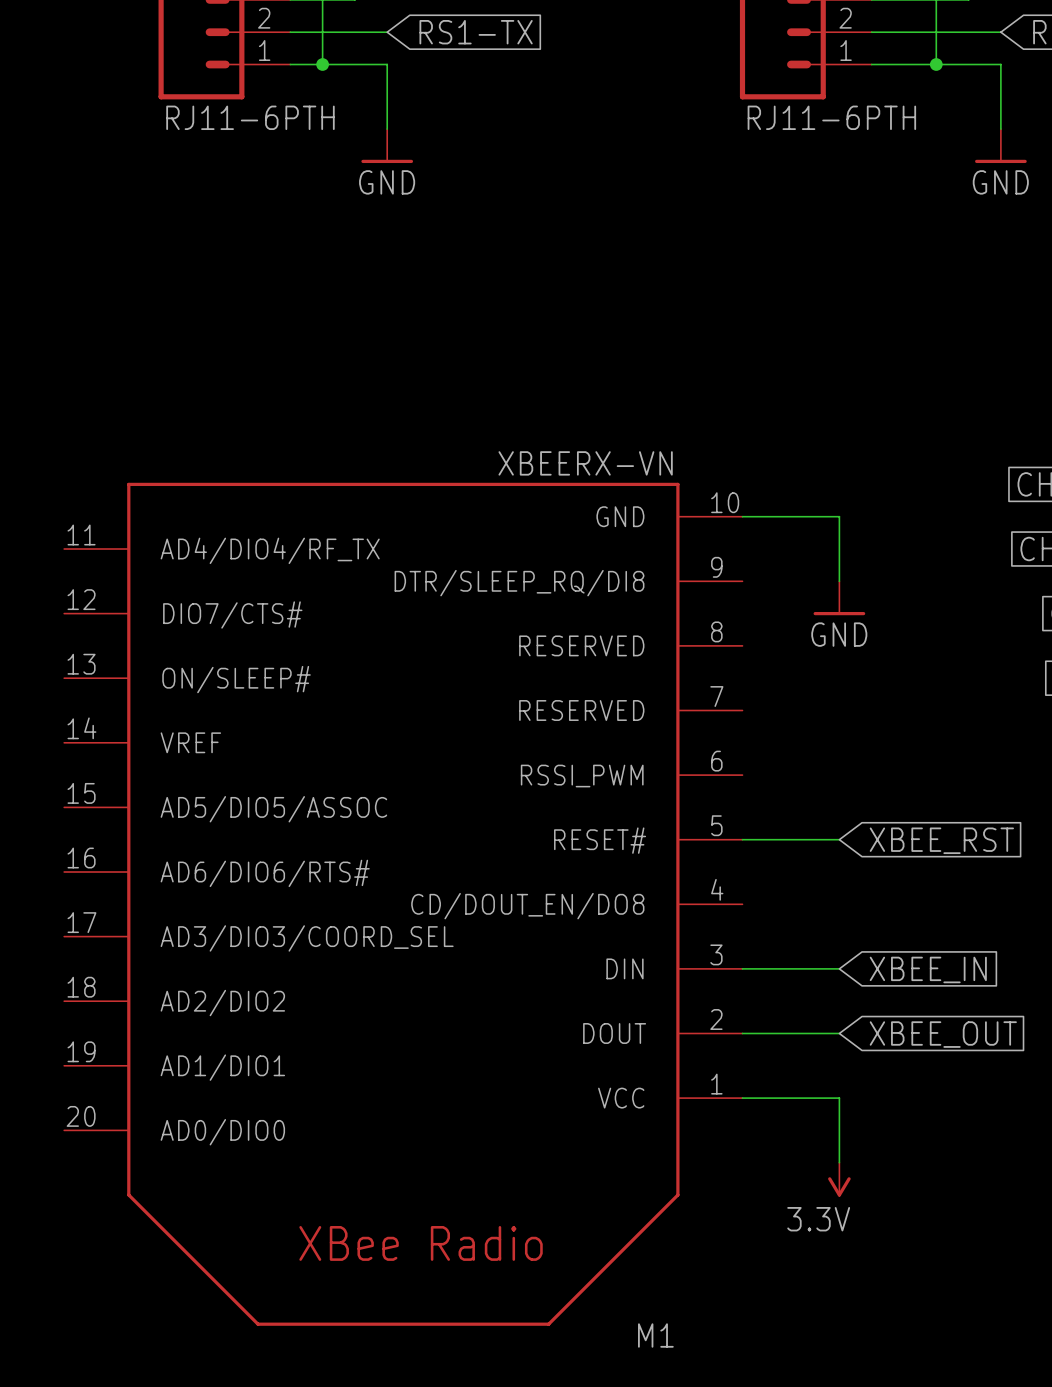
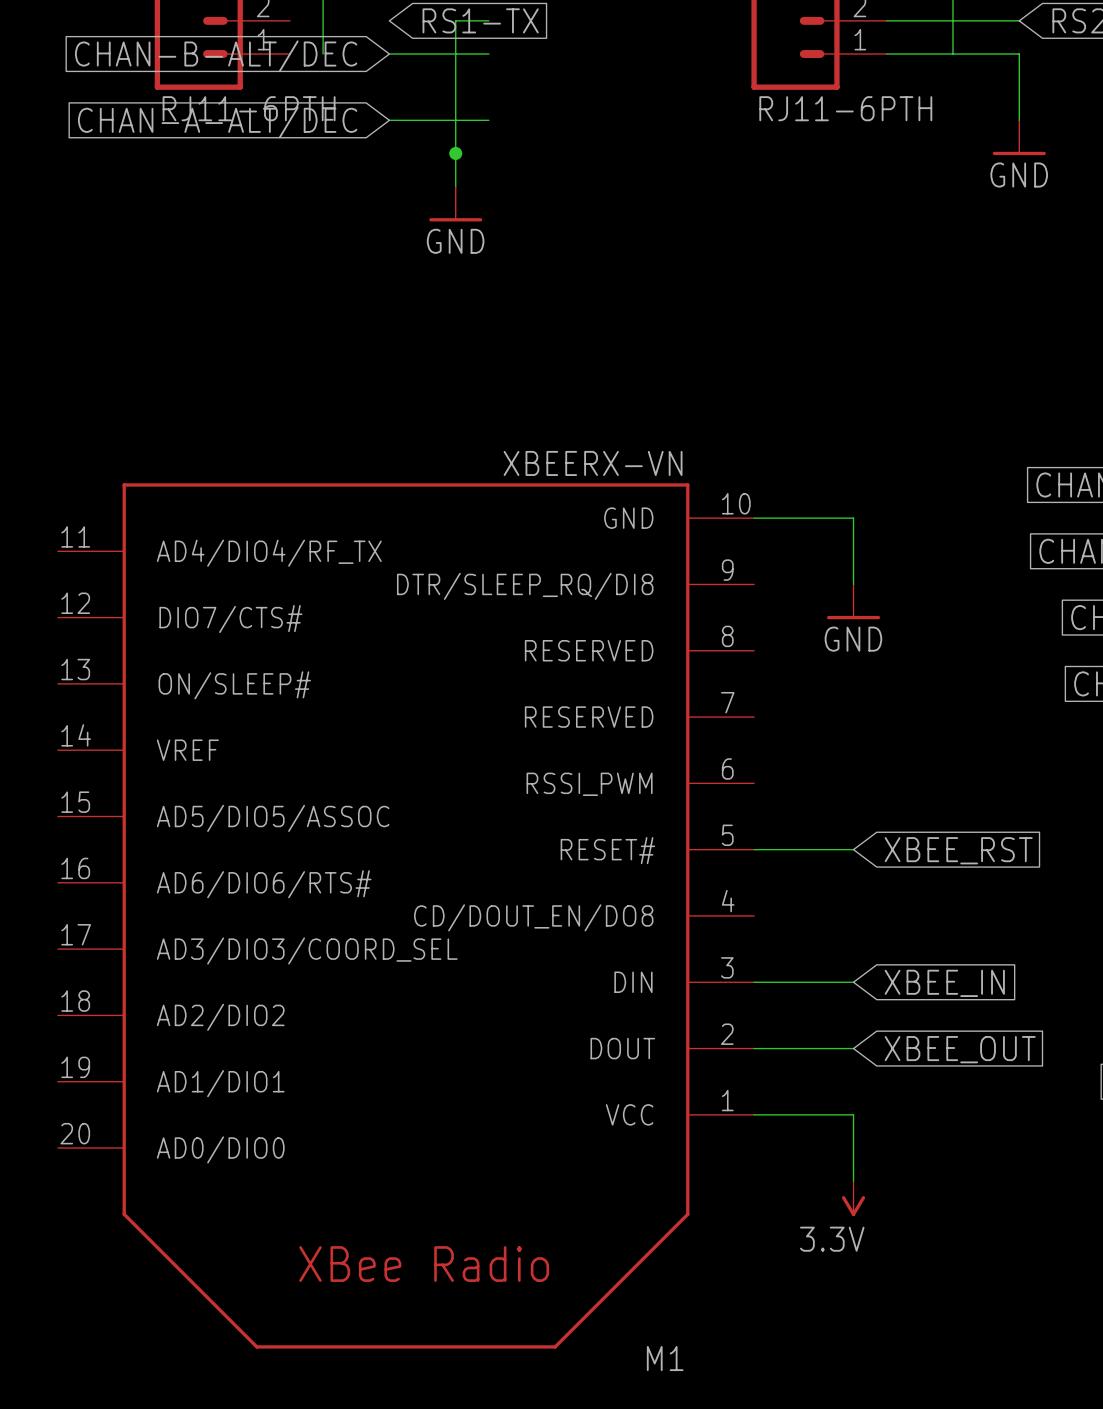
wire: (290, 32) (387, 32) -> (389, 54) (488, 54)
wire: none -> (488, 20) (455, 20) (455, 186)
wire: (290, 64) (387, 64) (387, 129) -> (488, 120) (389, 120)
junction: (322, 64) -> none
junction: (936, 64) -> none
global label: none -> CHAN-B-ALT/DEC (216, 56)
global label: none -> CHAN-A-ALT/DEC (217, 122)
power symbol position: GND (387, 146) -> GND (455, 204)
junction: none -> (455, 153)

